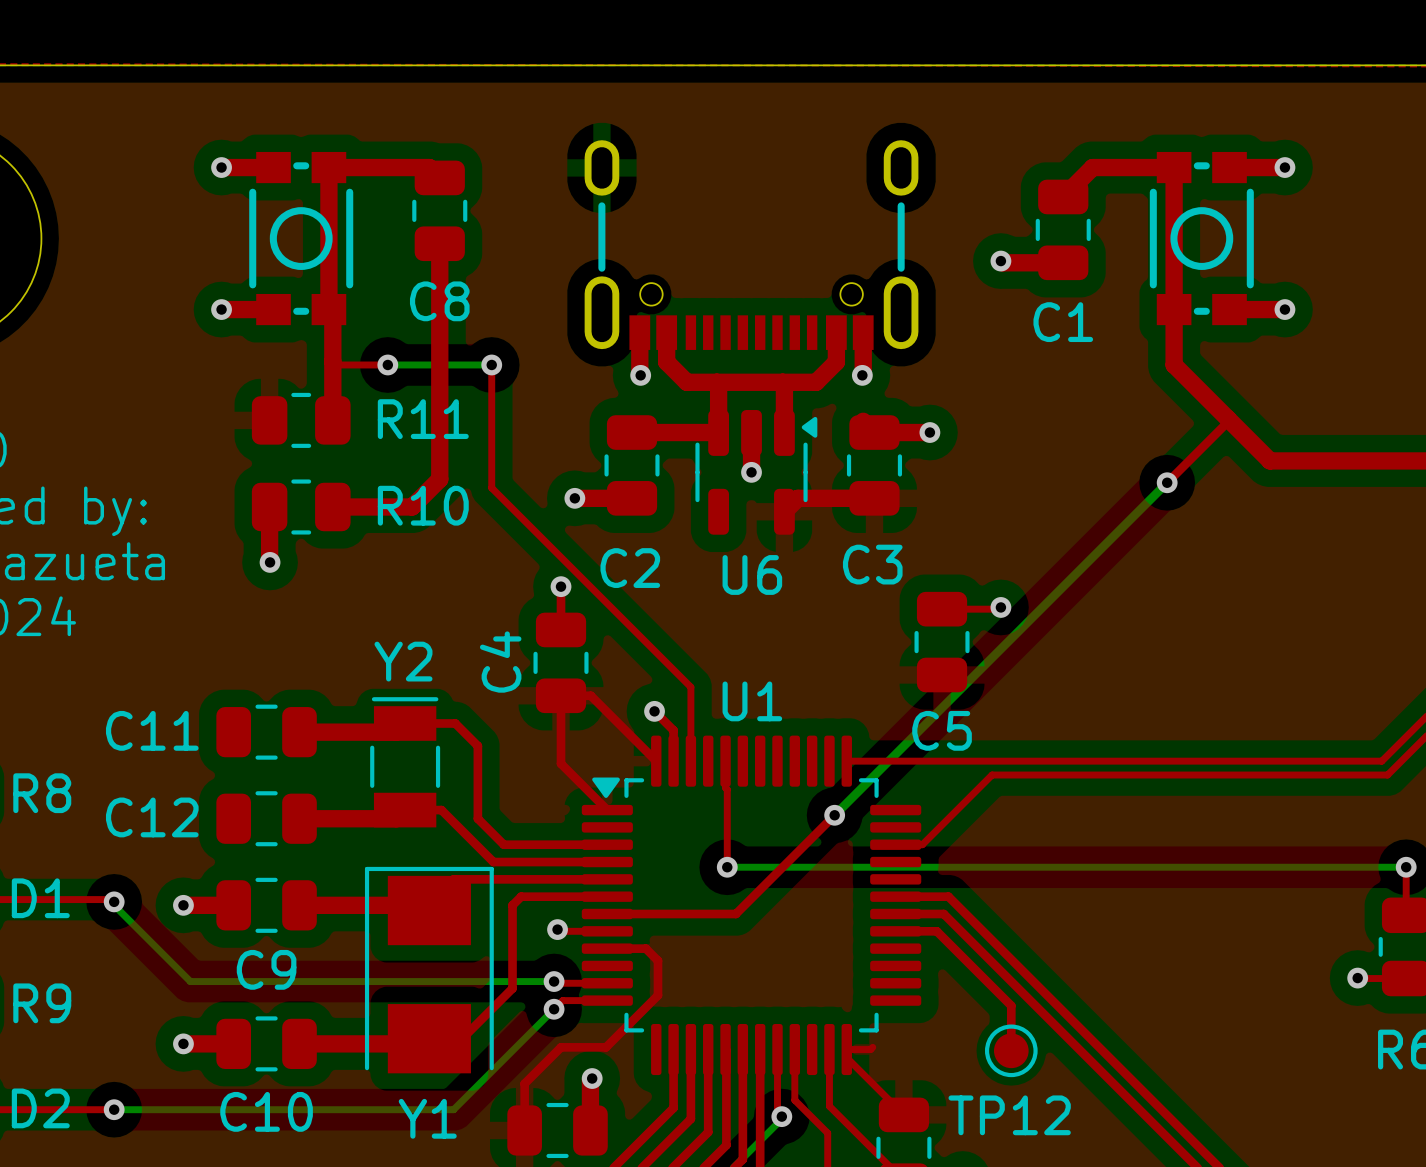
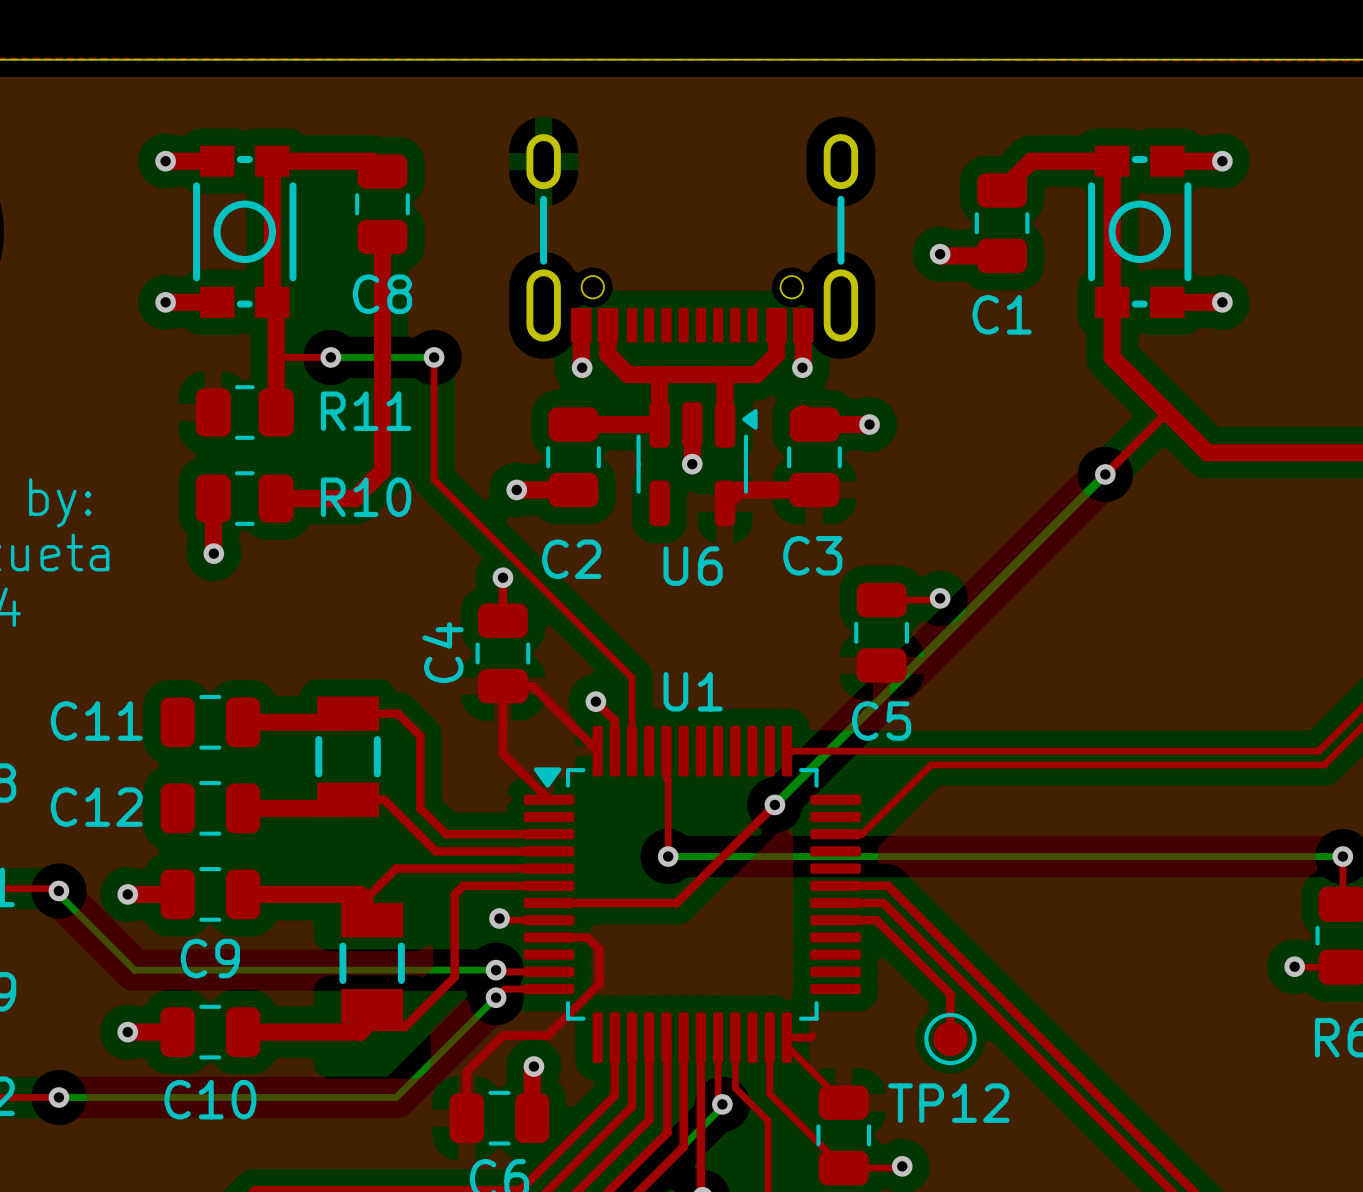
Y2: (405, 762) -> none
part: none -> (348, 756)
Y1: (429, 970) -> none
part: none -> (372, 963)

